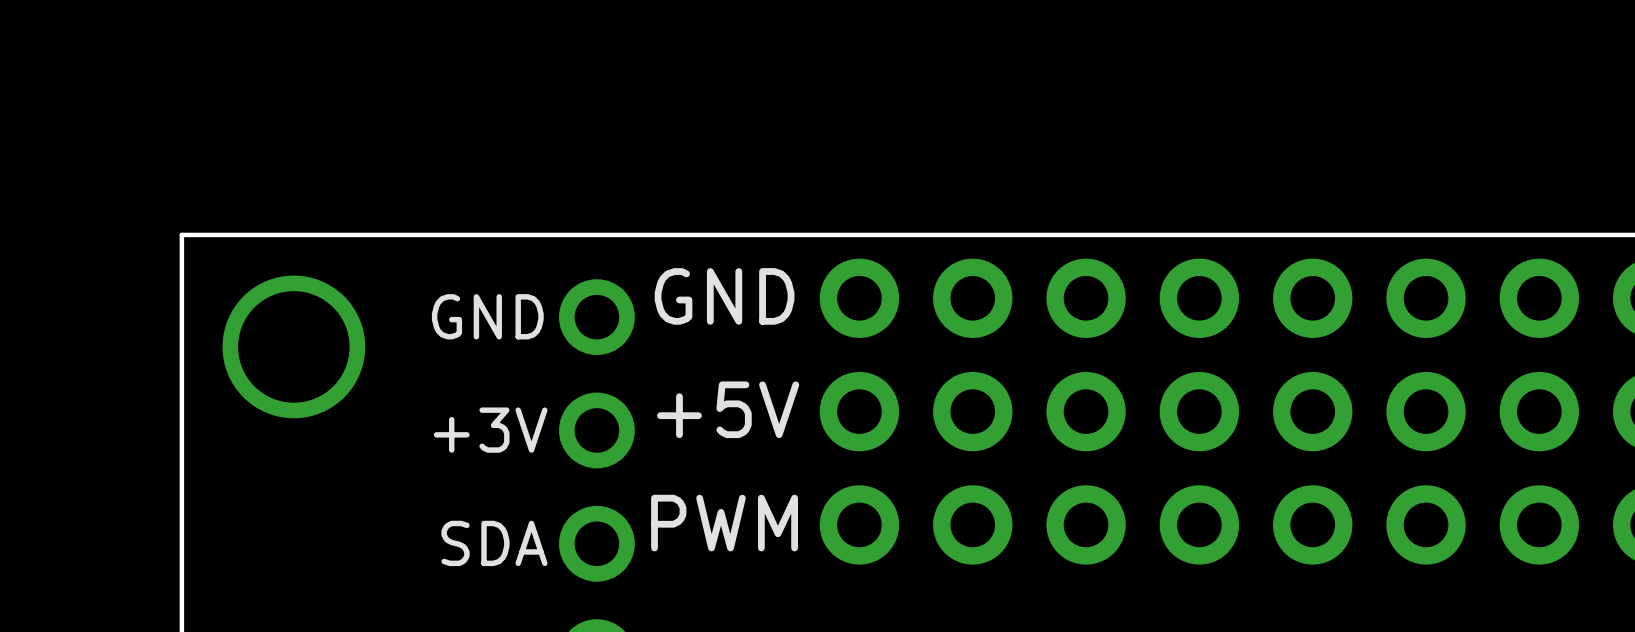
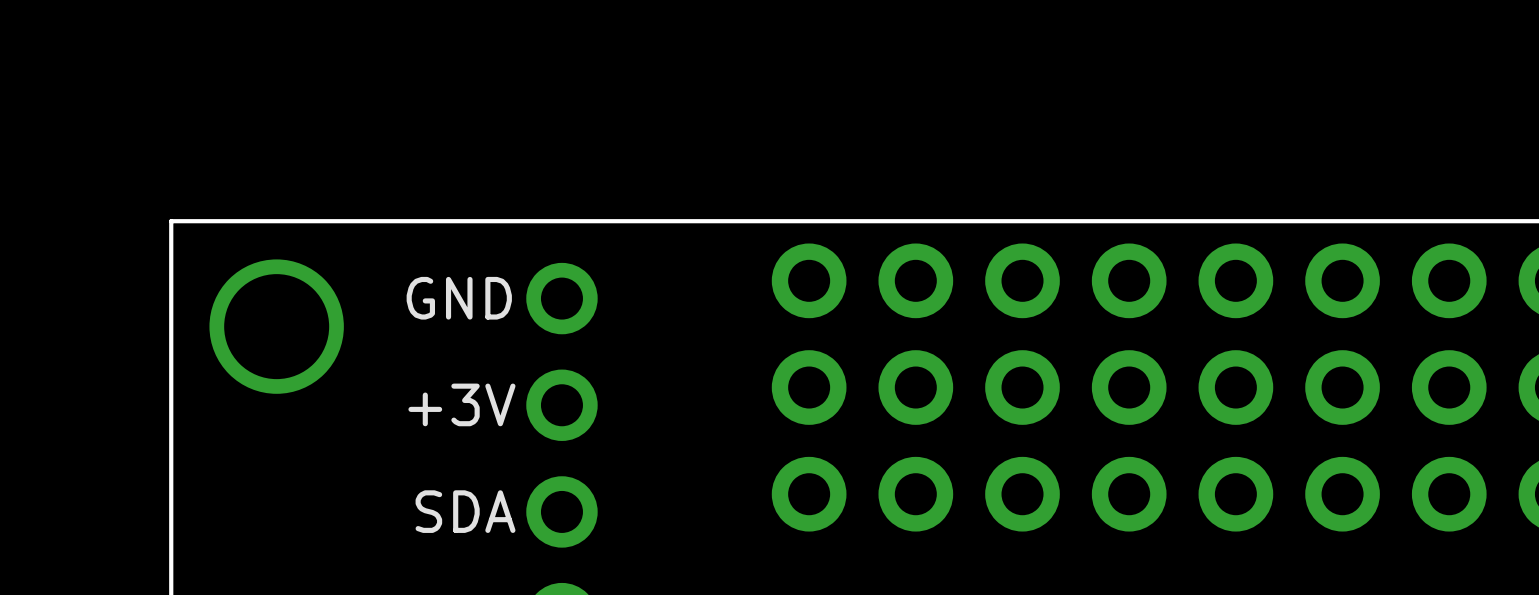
text: GND (724, 296) -> none
text: +5V (728, 409) -> none
text: PWM (724, 523) -> none

